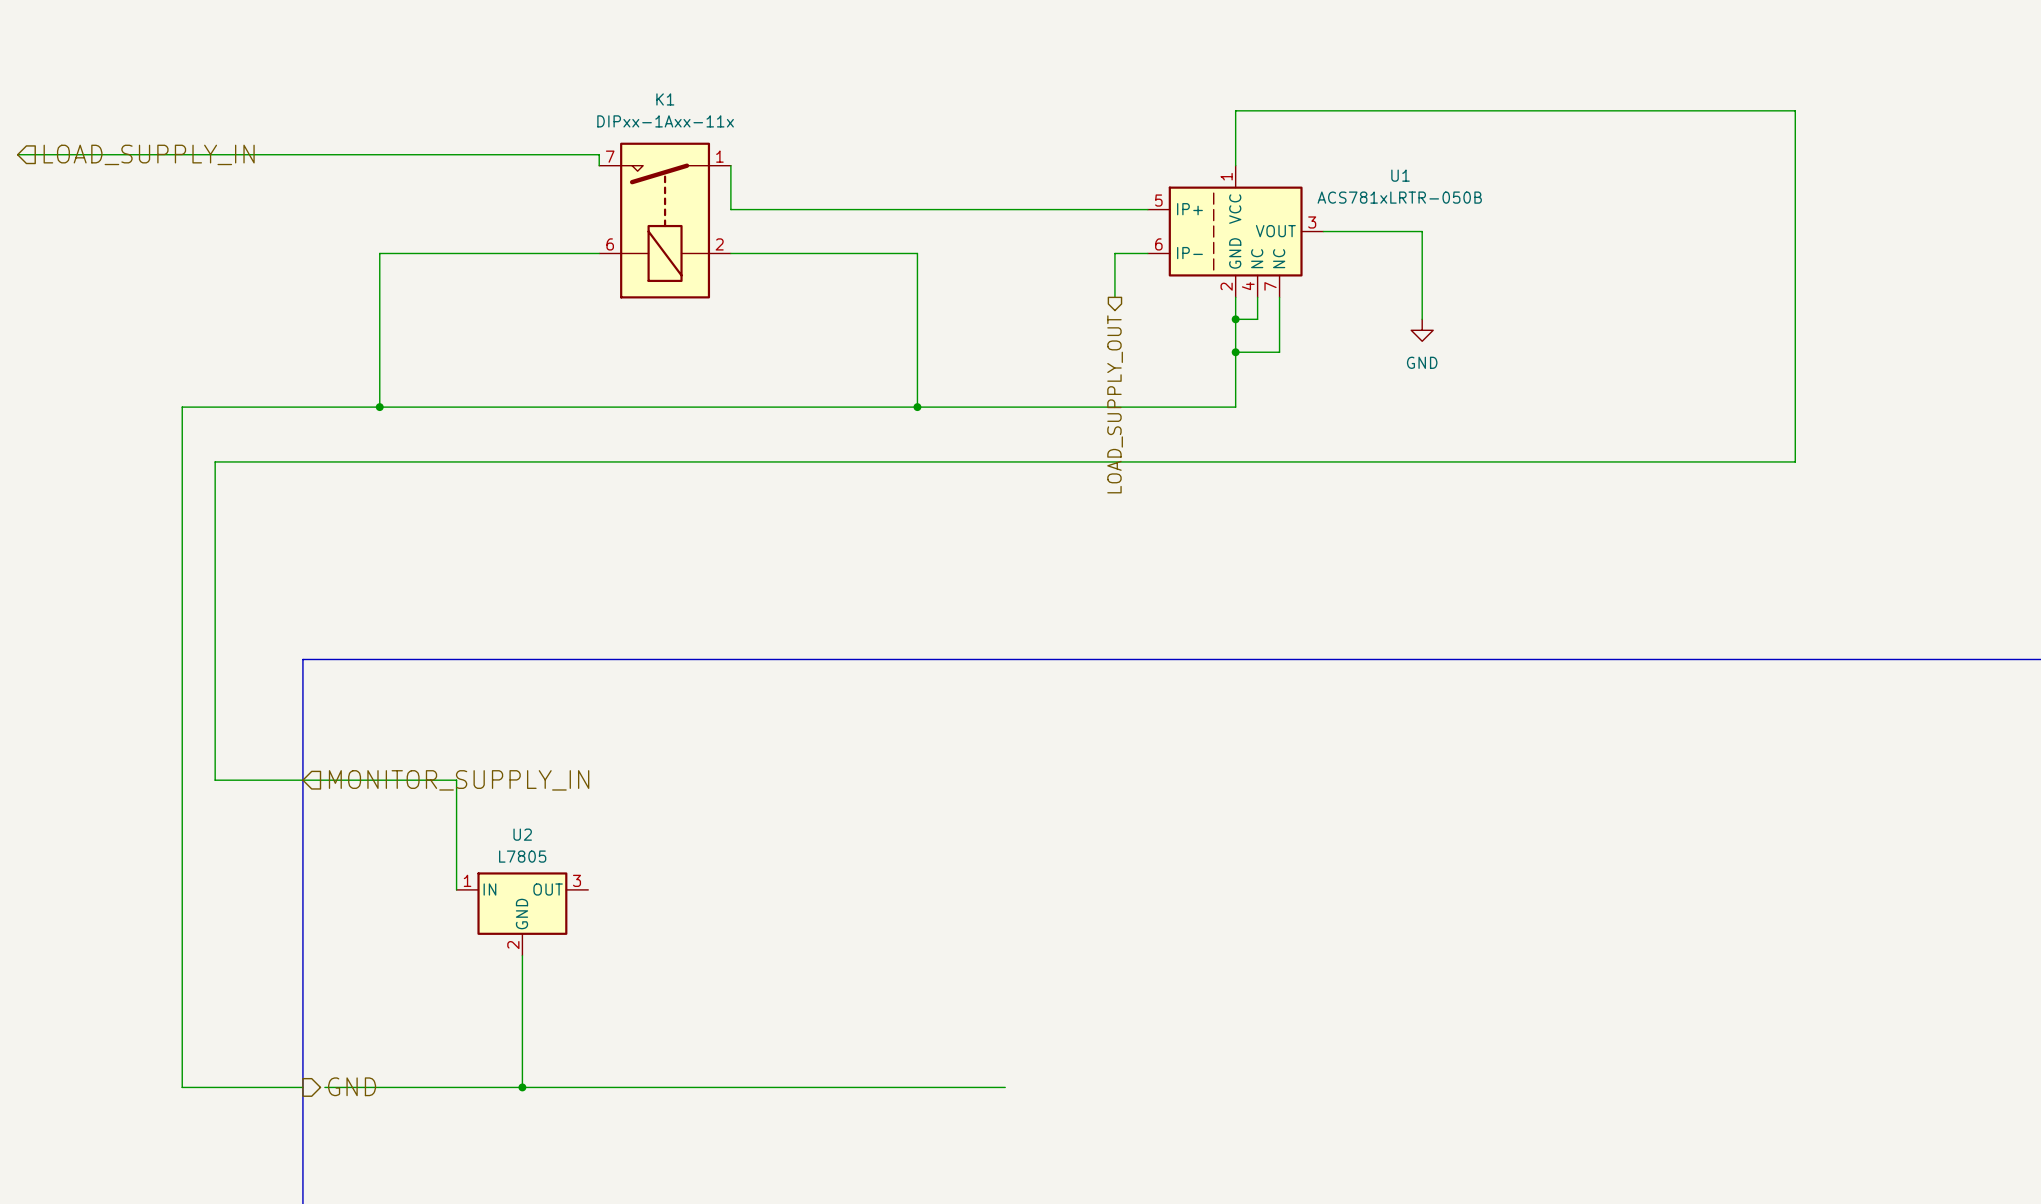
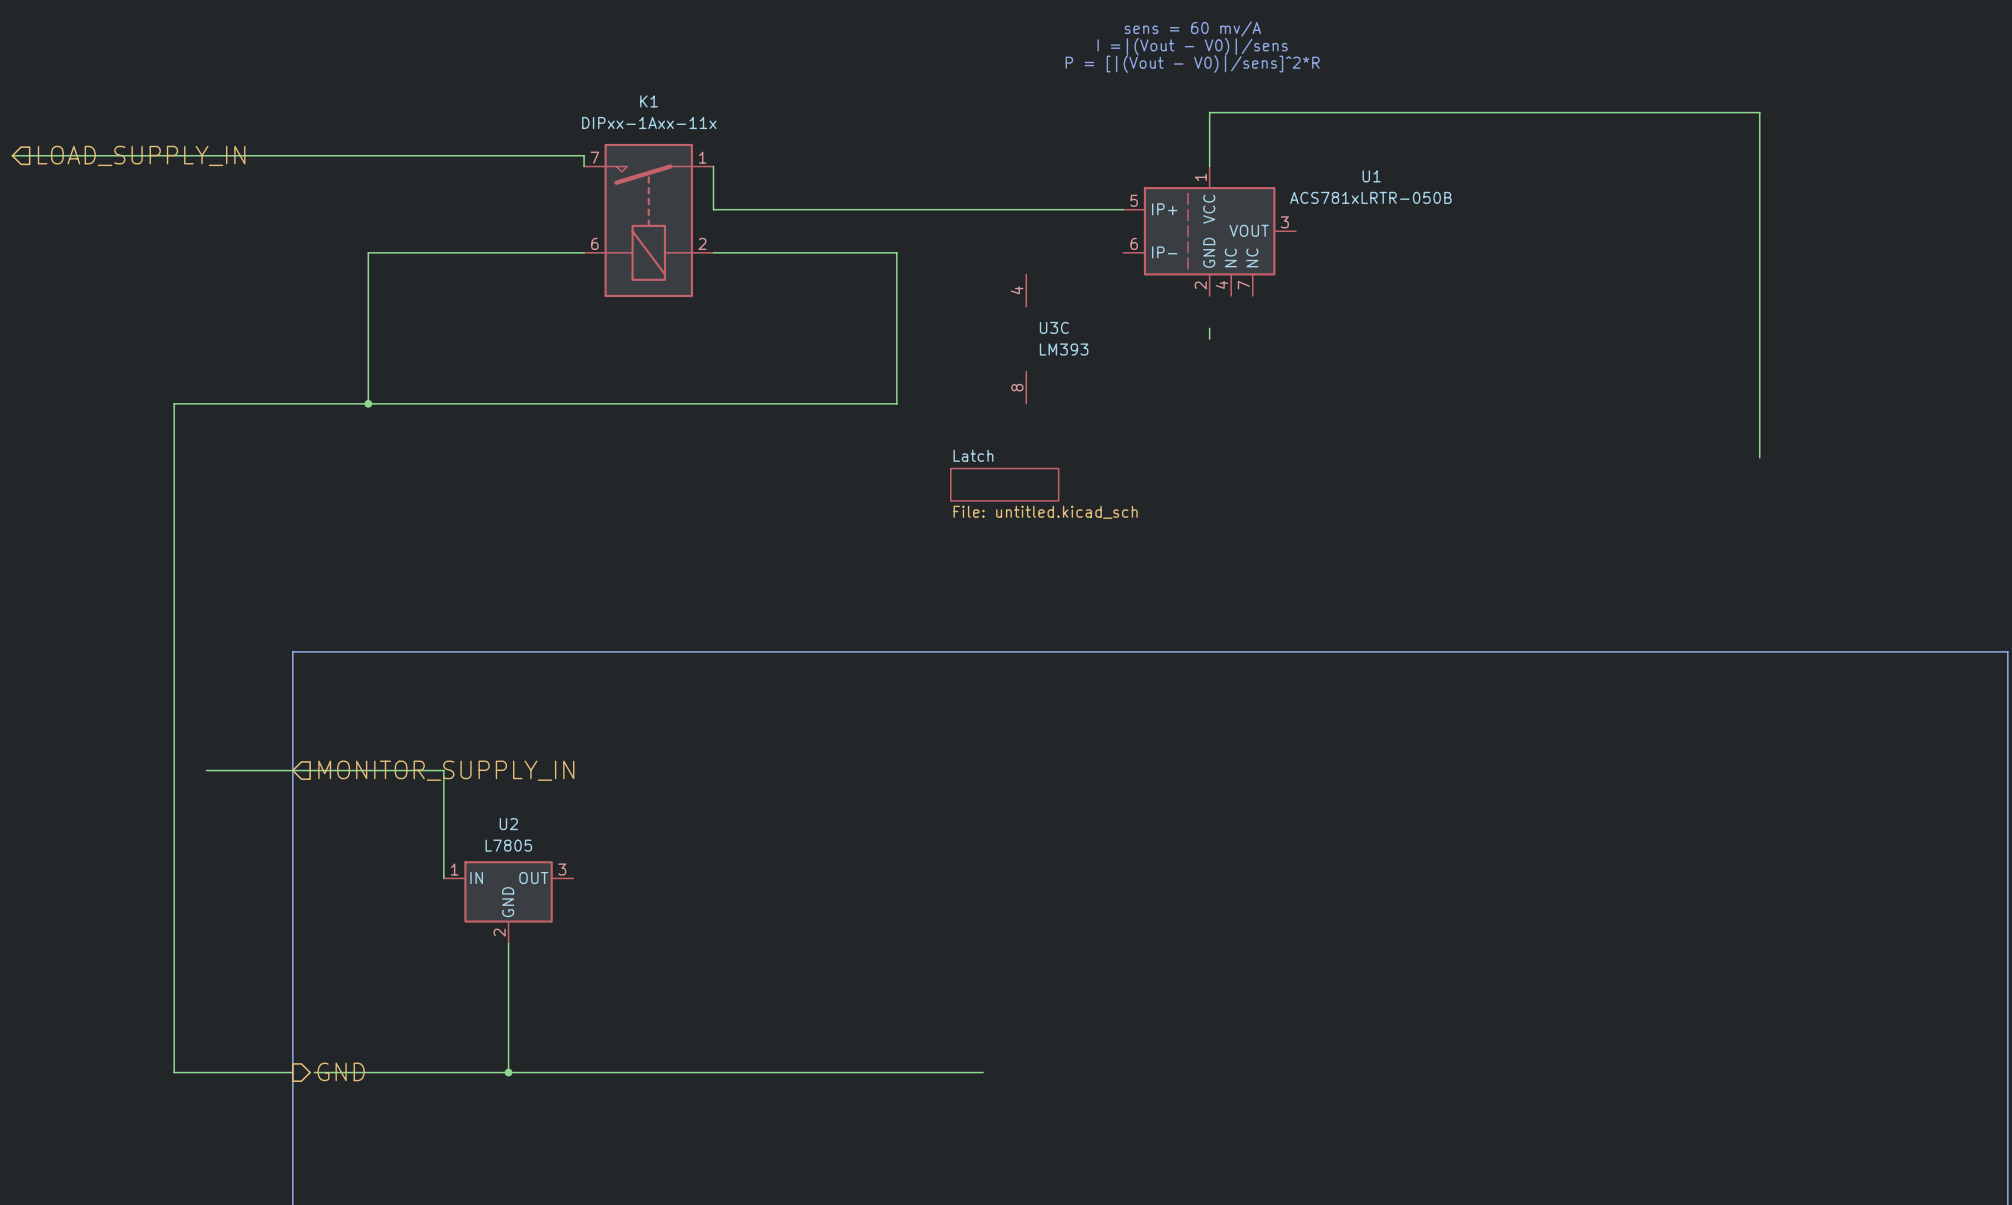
text: none -> sens = 60 mv/A (1192, 29)
text: none -> I =|(Vout - V0)|/sens (1192, 46)
text: none -> P = [|(Vout - V0)|/sens]^2*R (1192, 64)
wire: (1323, 231) (1422, 231) (1422, 319) -> none
wire: (1147, 253) (1114, 253) (1114, 297) -> none
wire: (1235, 297) (1235, 330) -> none
wire: (1257, 297) (1257, 319) (1235, 319) -> none
wire: (1279, 297) (1279, 352) (1235, 352) -> none
junction: (1235, 319) -> none
power symbol: GND (1422, 330) -> none
U3C: none -> LM393 (1026, 339)
wire: (1235, 341) (1235, 407) (917, 407) -> none
junction: (1235, 352) -> none
hierarchical label: LOAD_SUPPLY_OUT (1115, 404) -> none
junction: (917, 407) -> none
wire: (1795, 461) (215, 461) (215, 780) -> none
sheet Latch: none -> File: untitled.kicad_sch (1004, 484)

